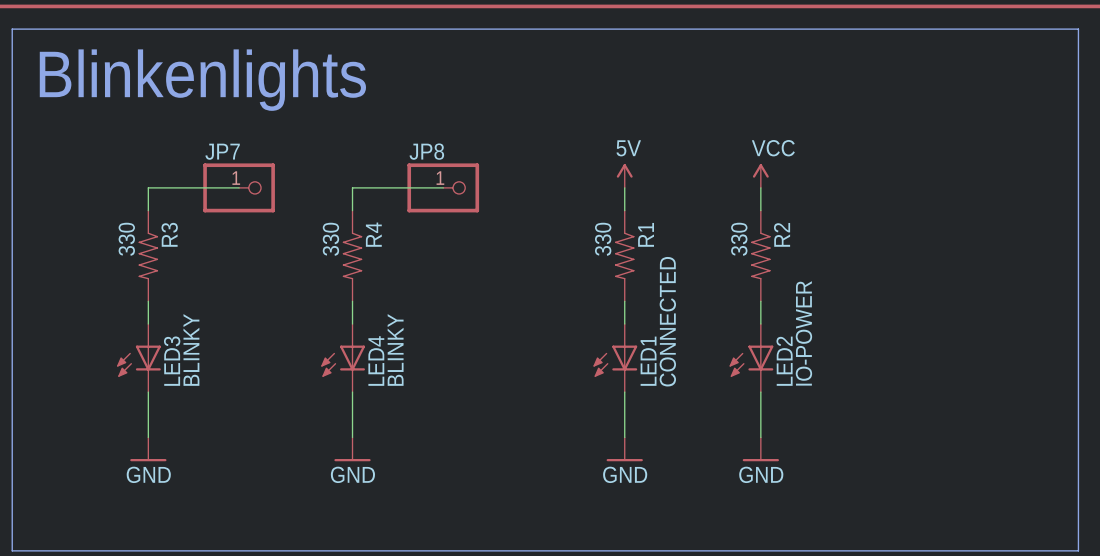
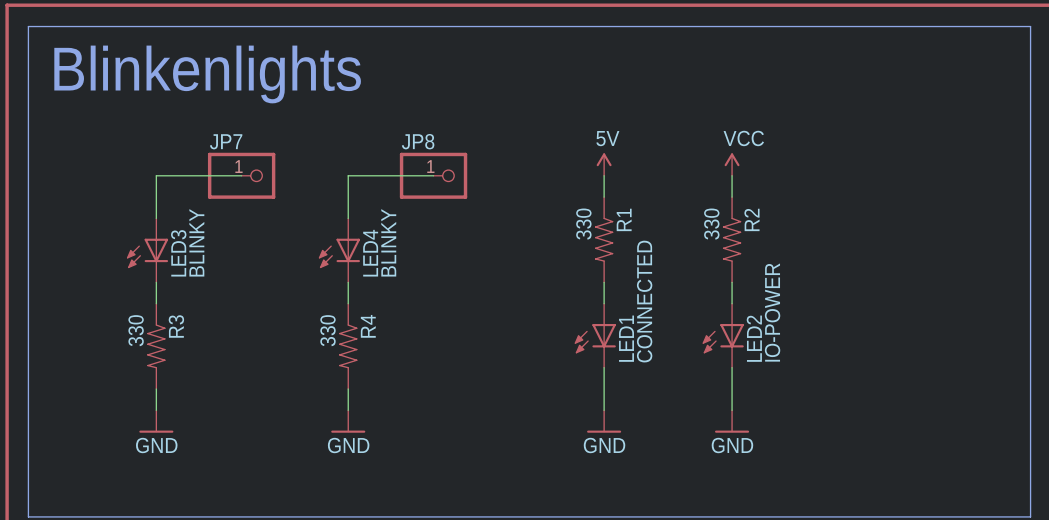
R3 position: (148, 255) -> (156, 346)
R4 position: (352, 255) -> (348, 346)
LED3 position: (138, 358) -> (147, 250)
LED4 position: (343, 358) -> (339, 250)

